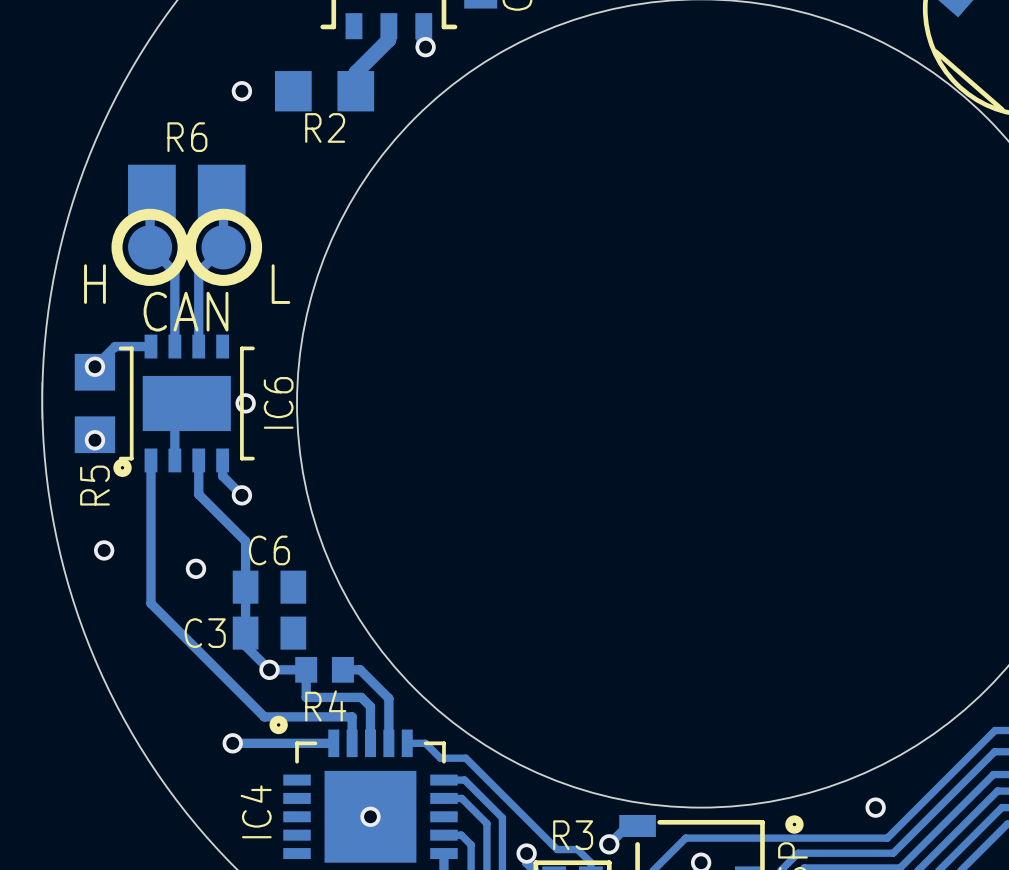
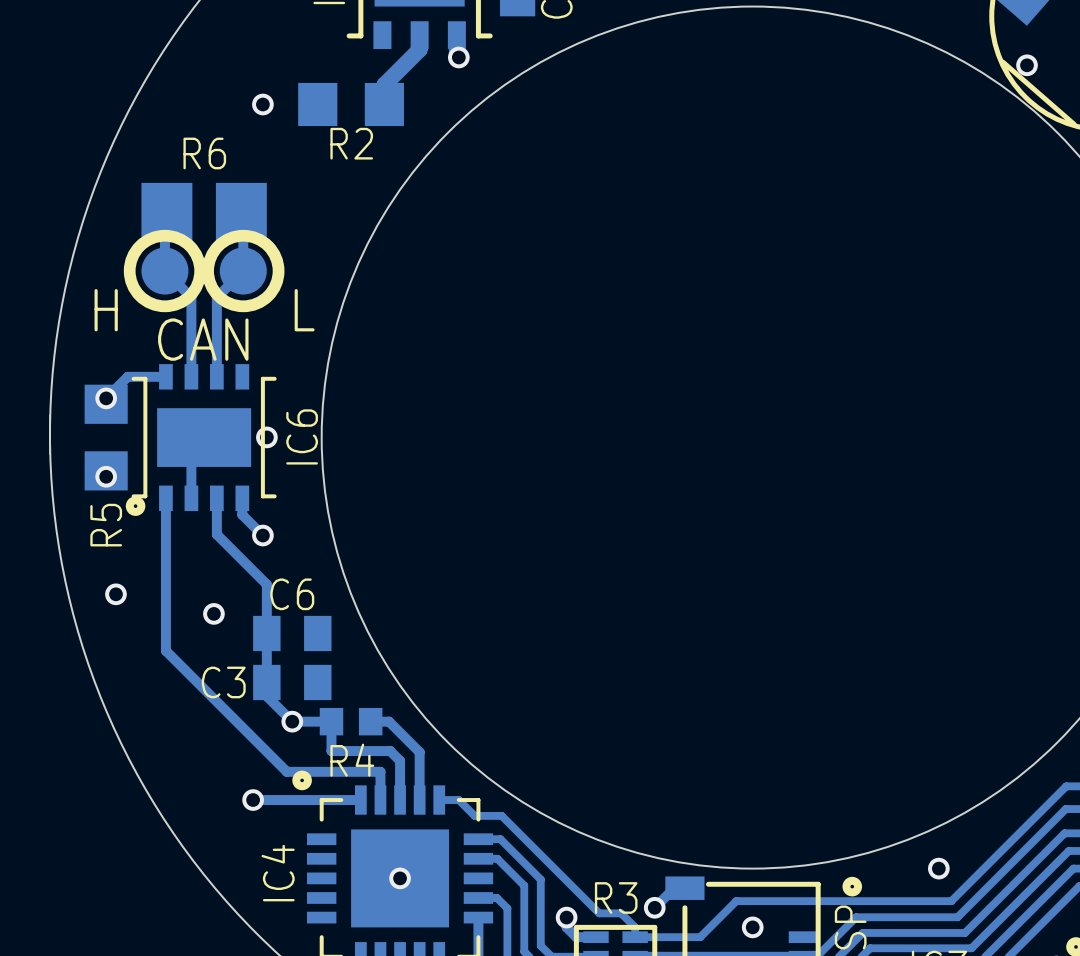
via: none -> (1027, 65)

